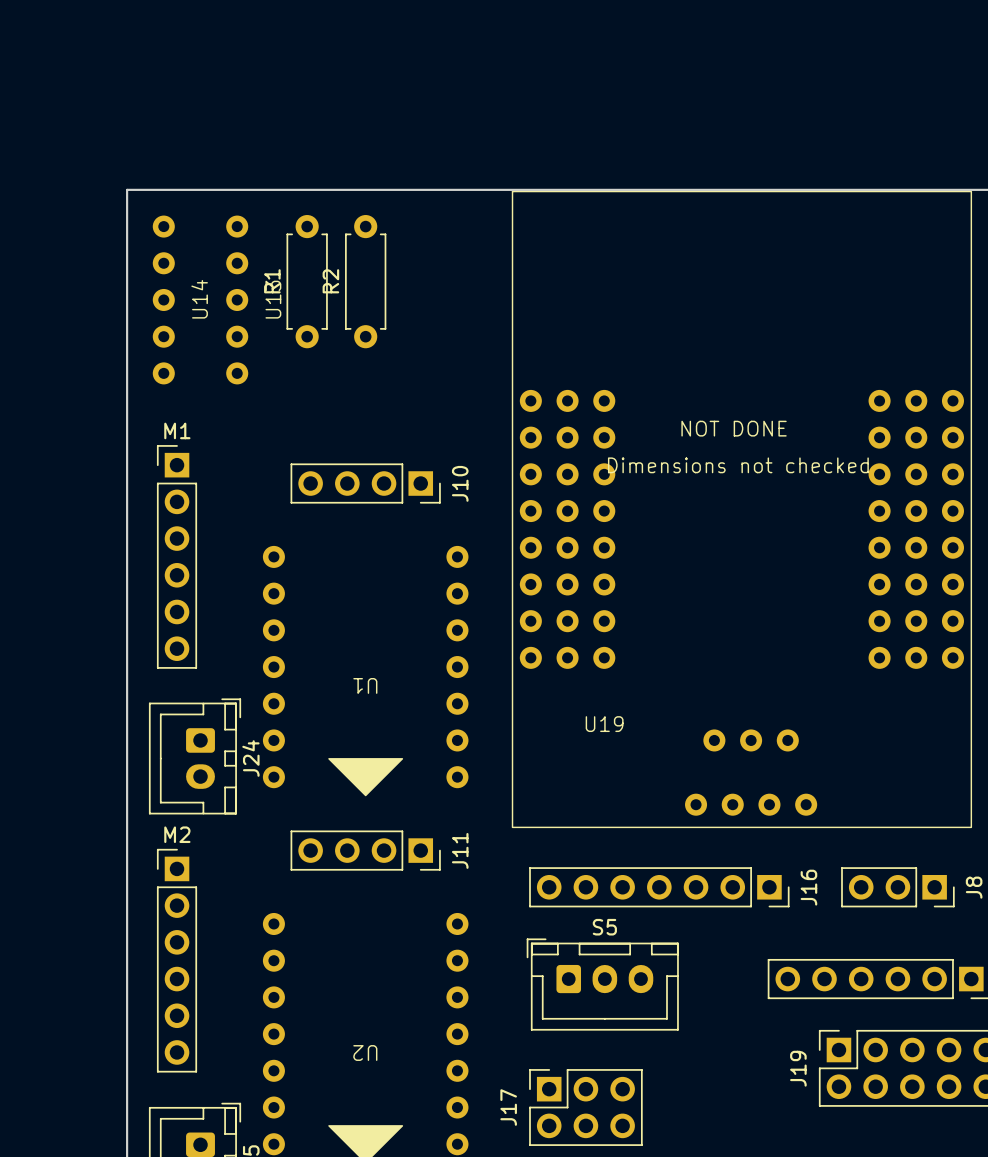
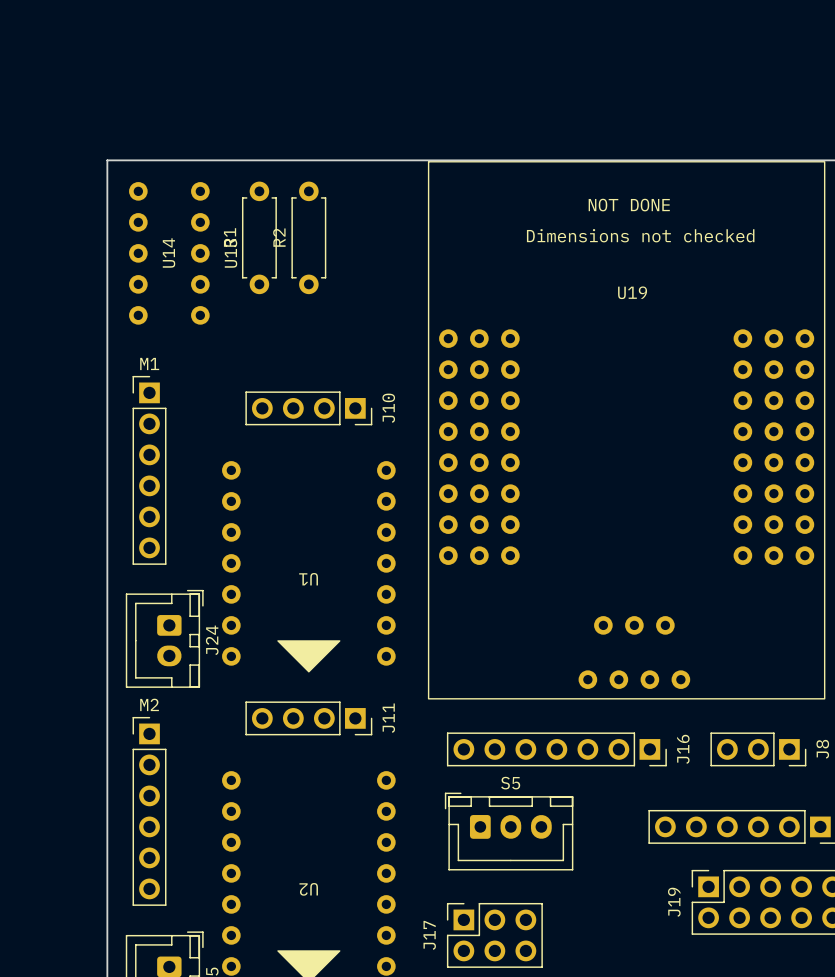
U19 footprint: [511, 190, 973, 829] -> [427, 161, 826, 700]
U19 name position: U19 (604, 724) -> U19 (632, 292)

